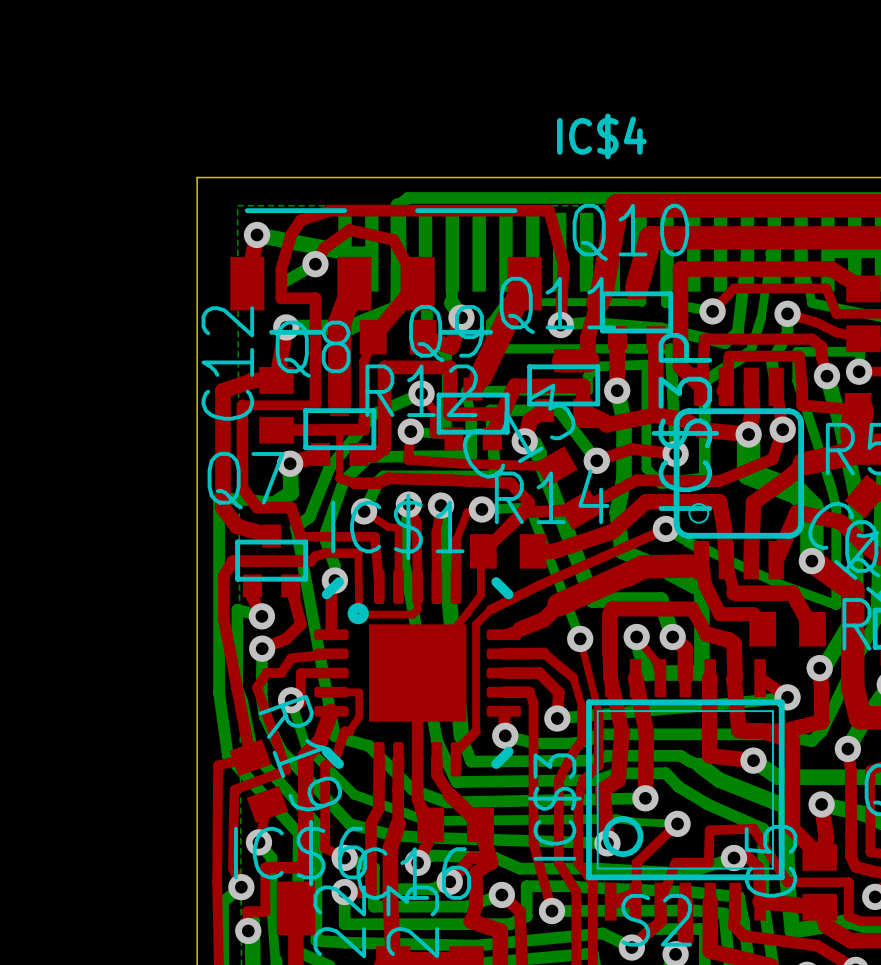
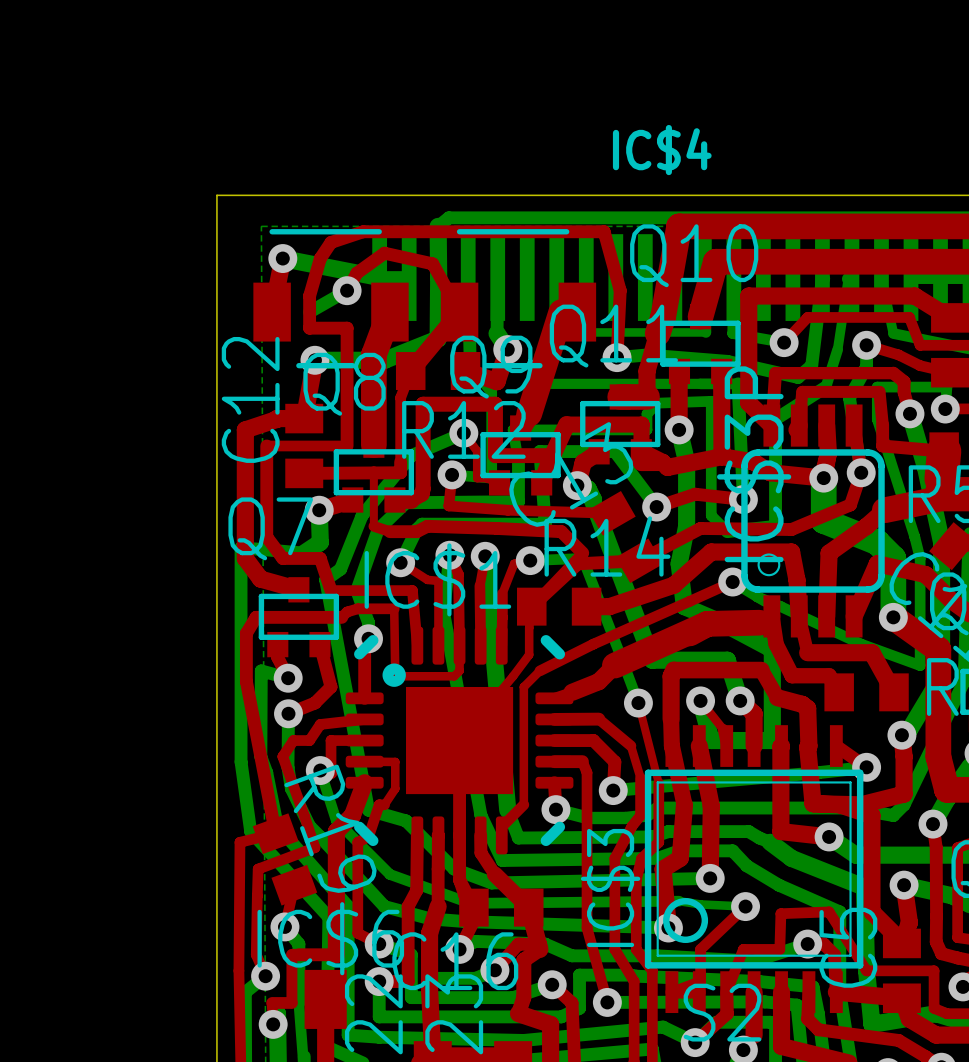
top track: (524, 283) (480, 376) -> (561, 312) (529, 413)

